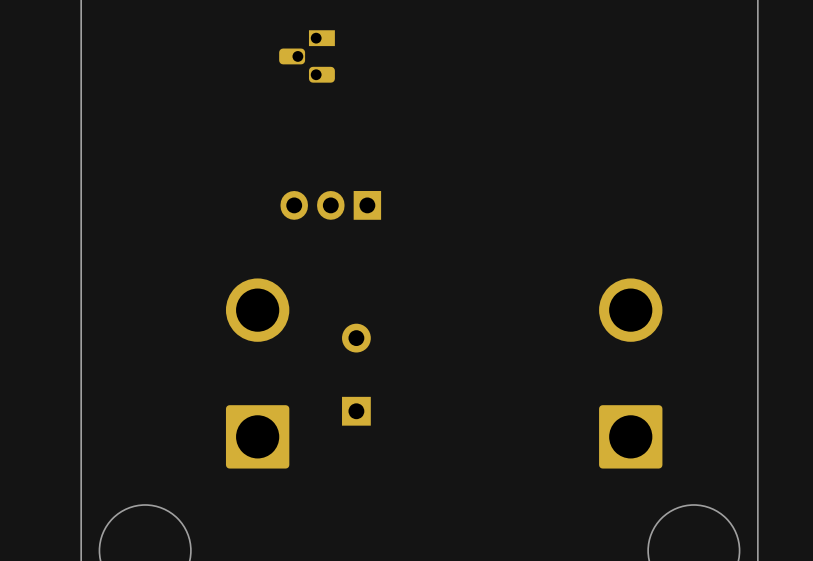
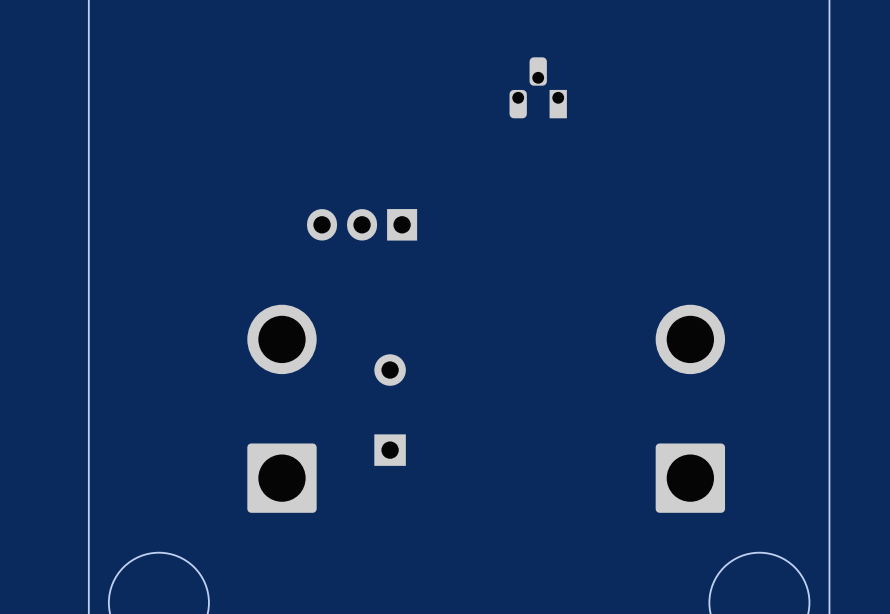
part rotation: 0° (307, 56) -> 90° clockwise (538, 87)
part position: (307, 56) -> (538, 87)

